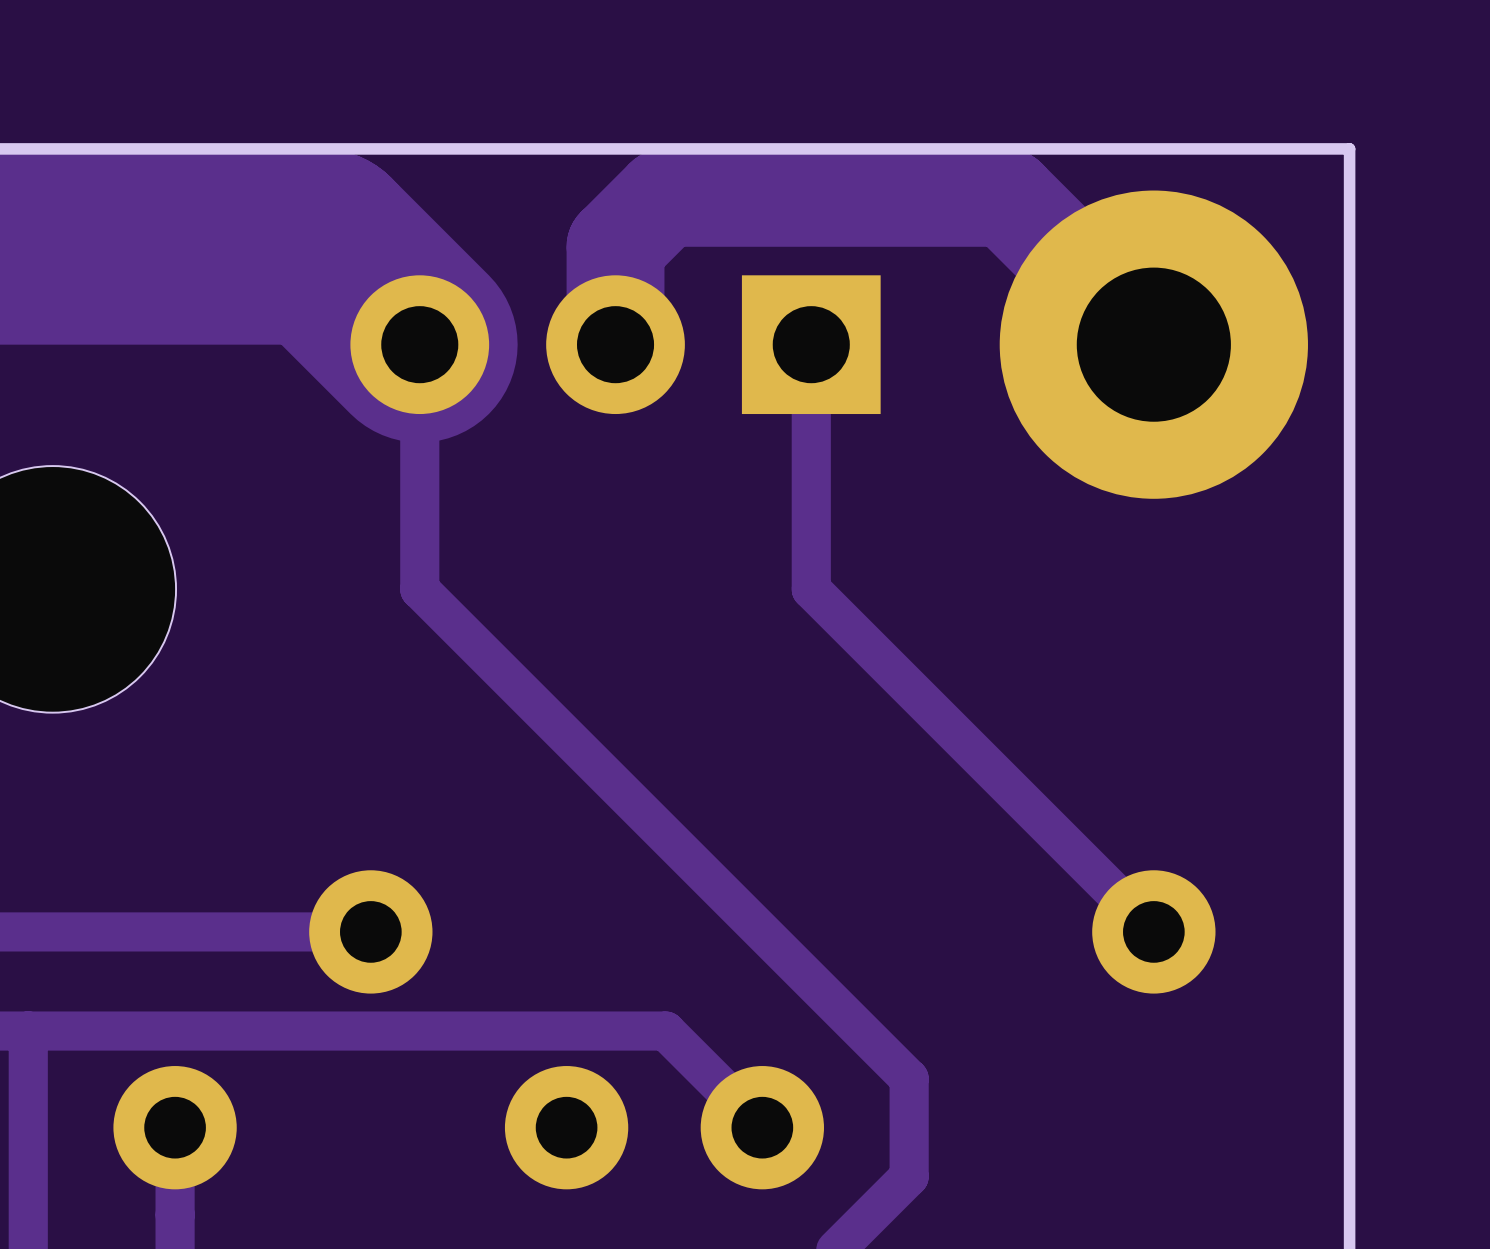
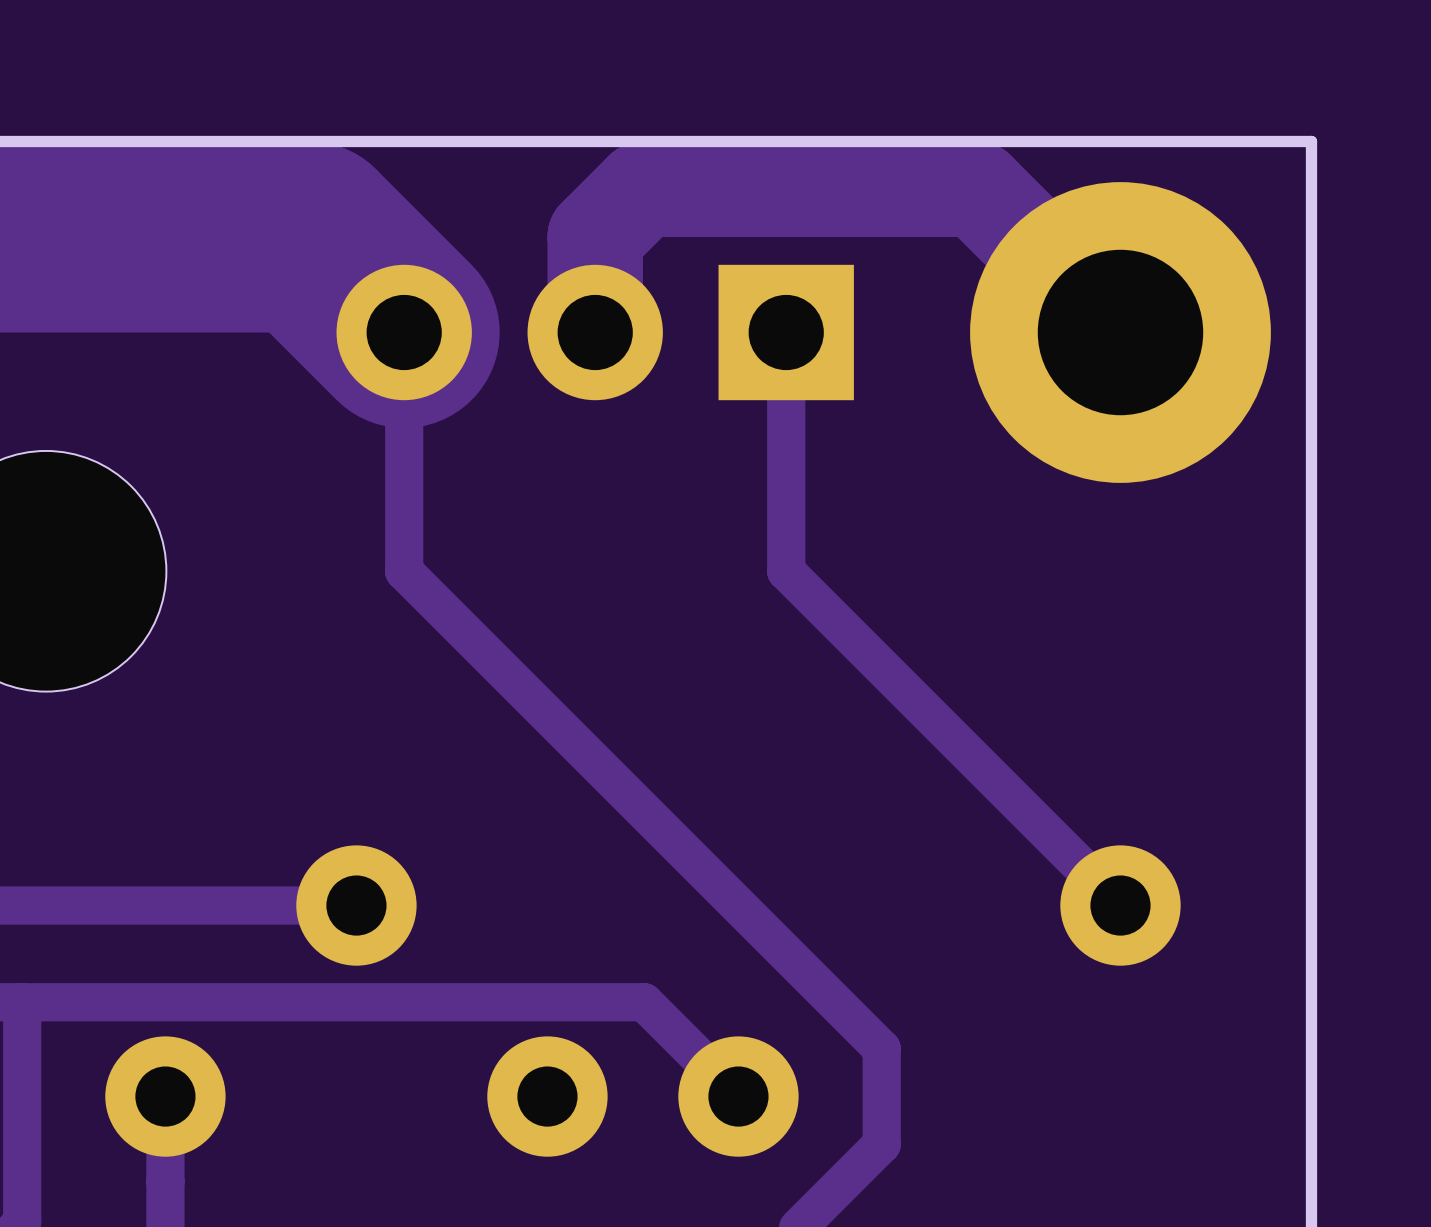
part footprint: [999, 190, 1308, 499] -> [970, 182, 1271, 483]

